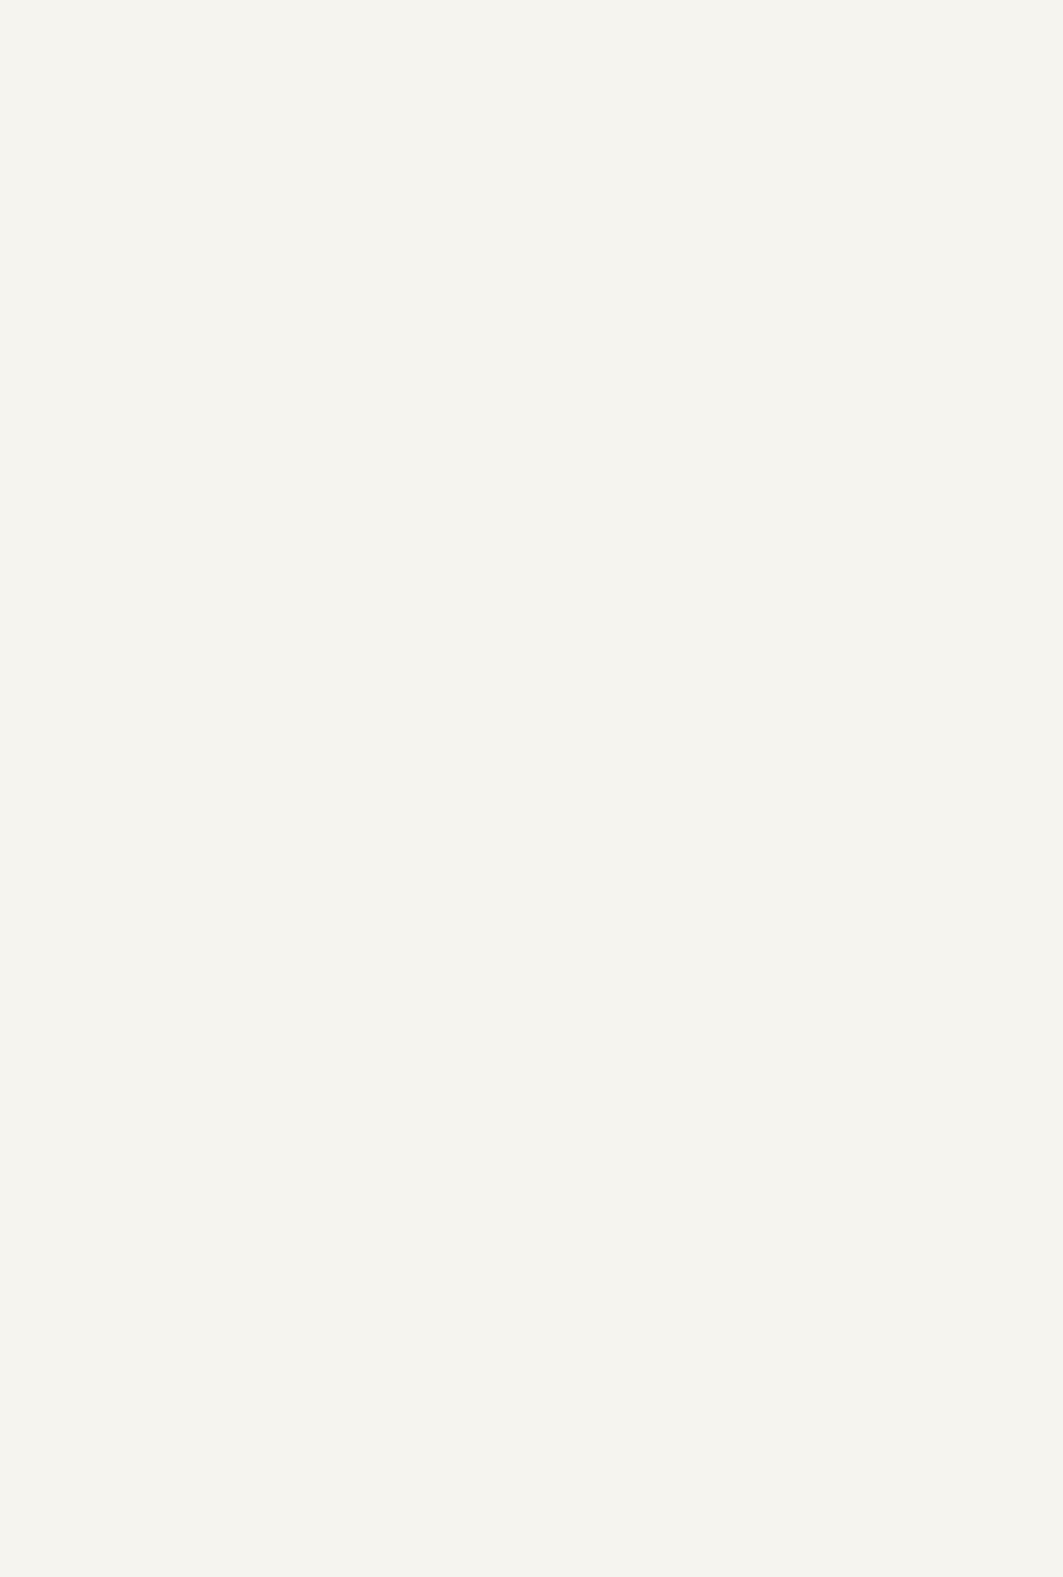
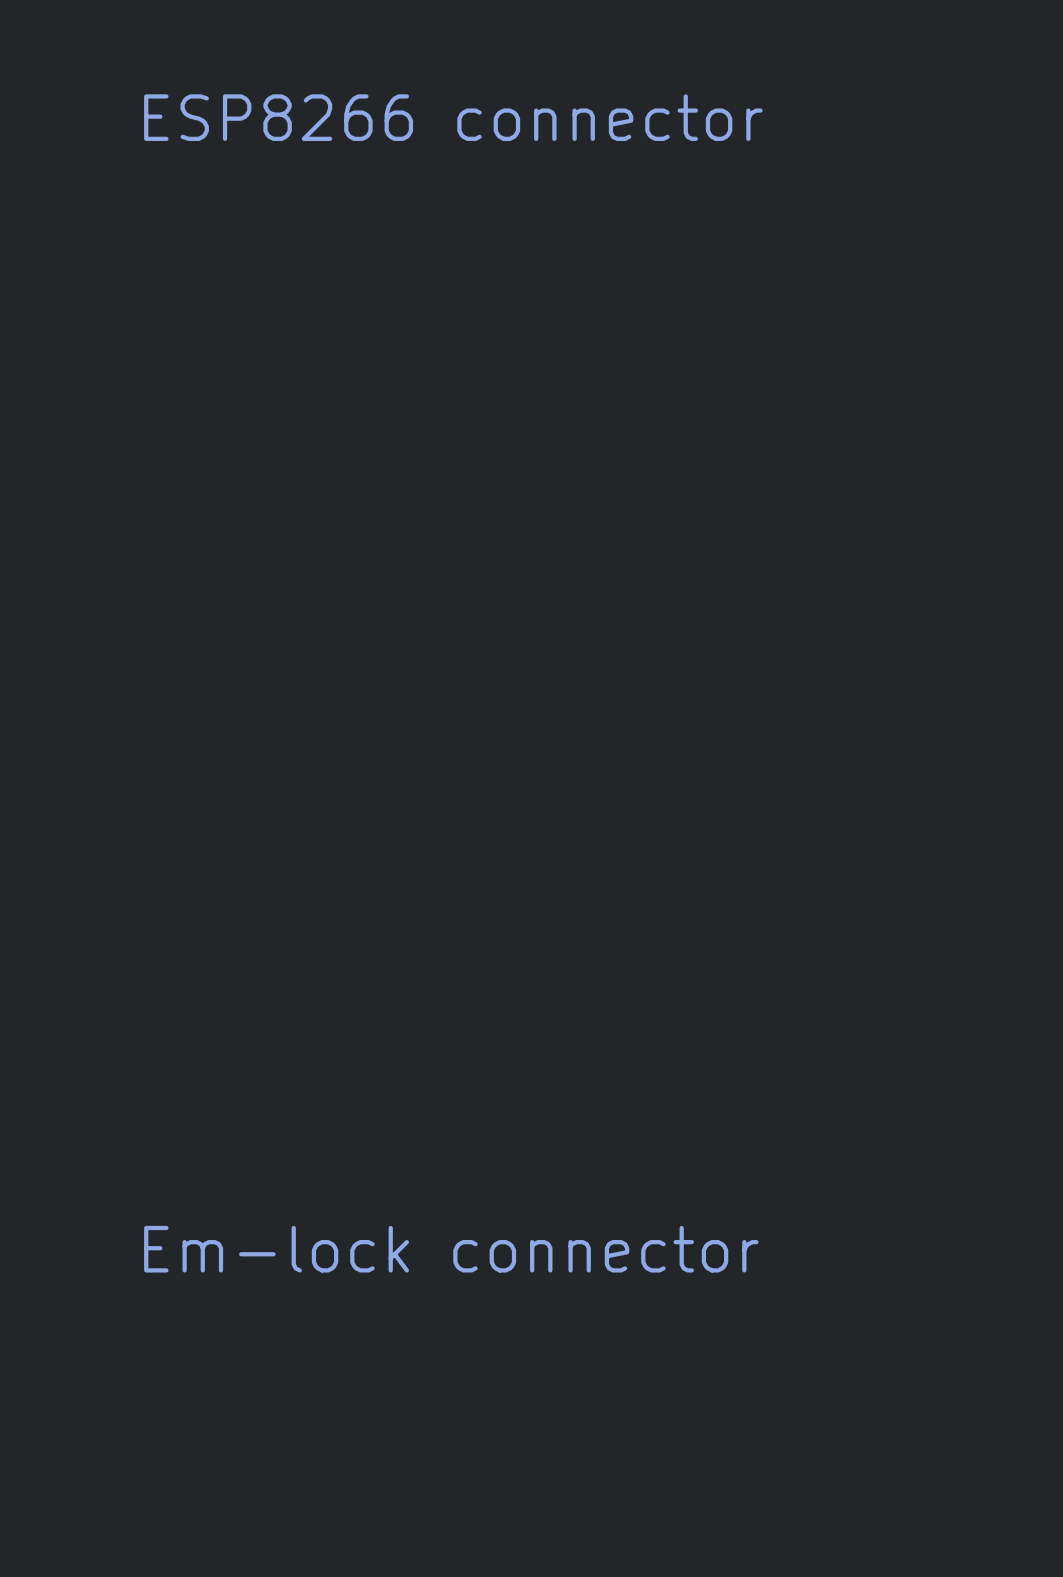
text: none -> ESP8266 connector (453, 117)
text: none -> Em-lock connector (451, 1249)

